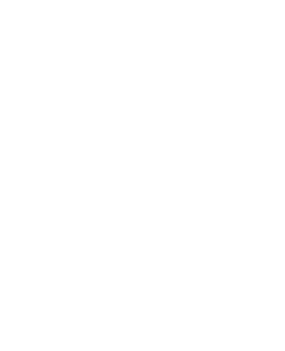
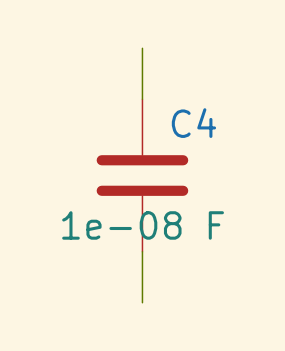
wire: none -> (142, 48) (142, 99)
C4: none -> 1e-08 F (142, 175)
wire: none -> (142, 251) (142, 302)

